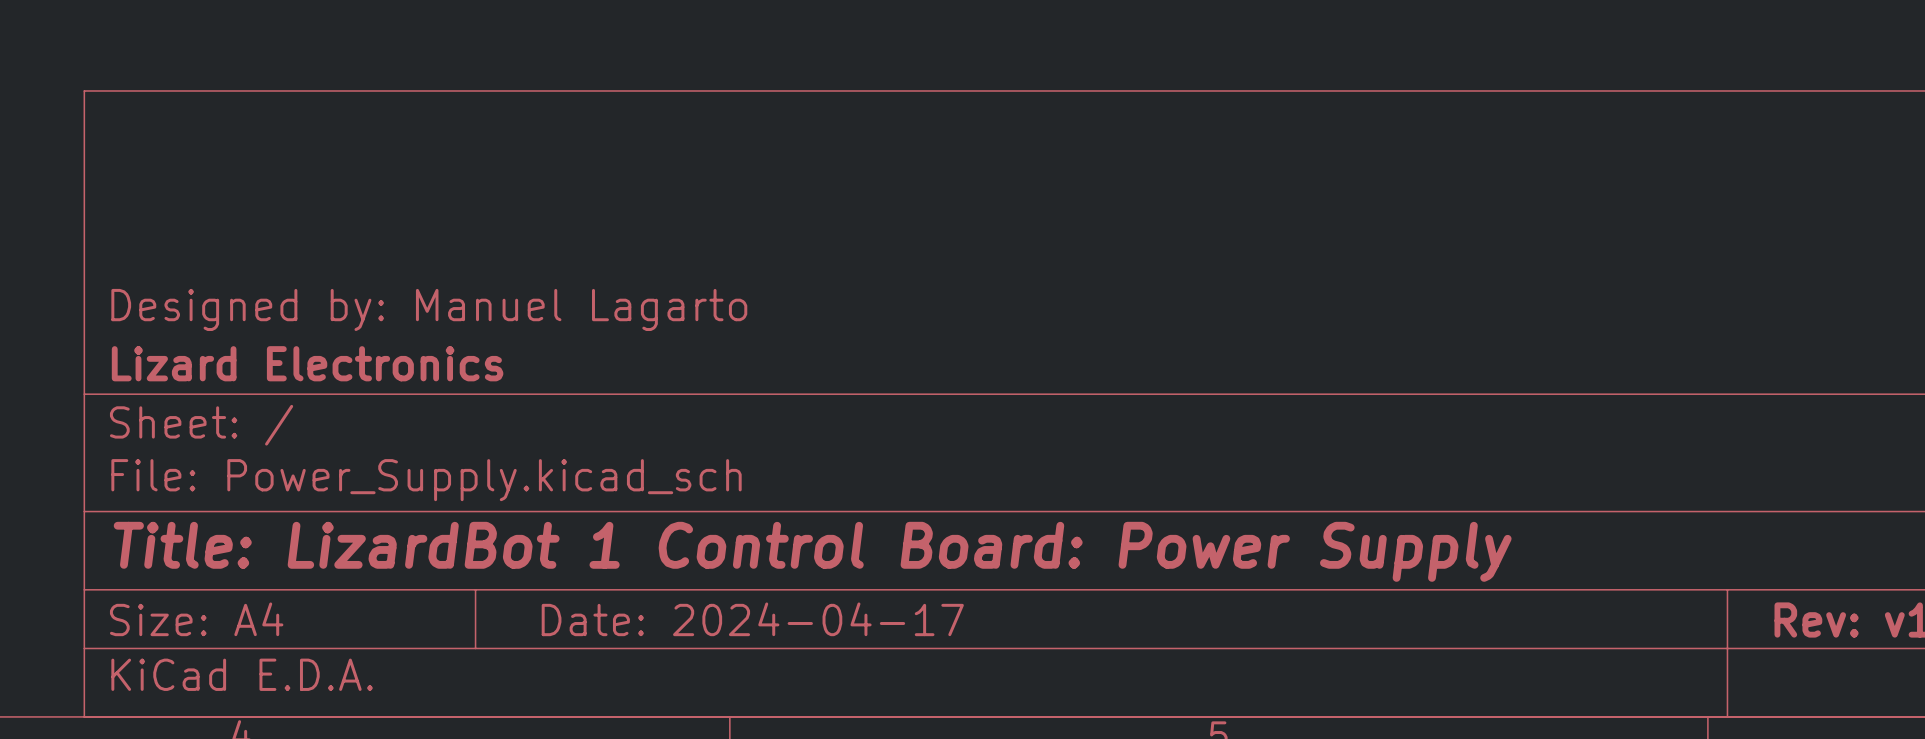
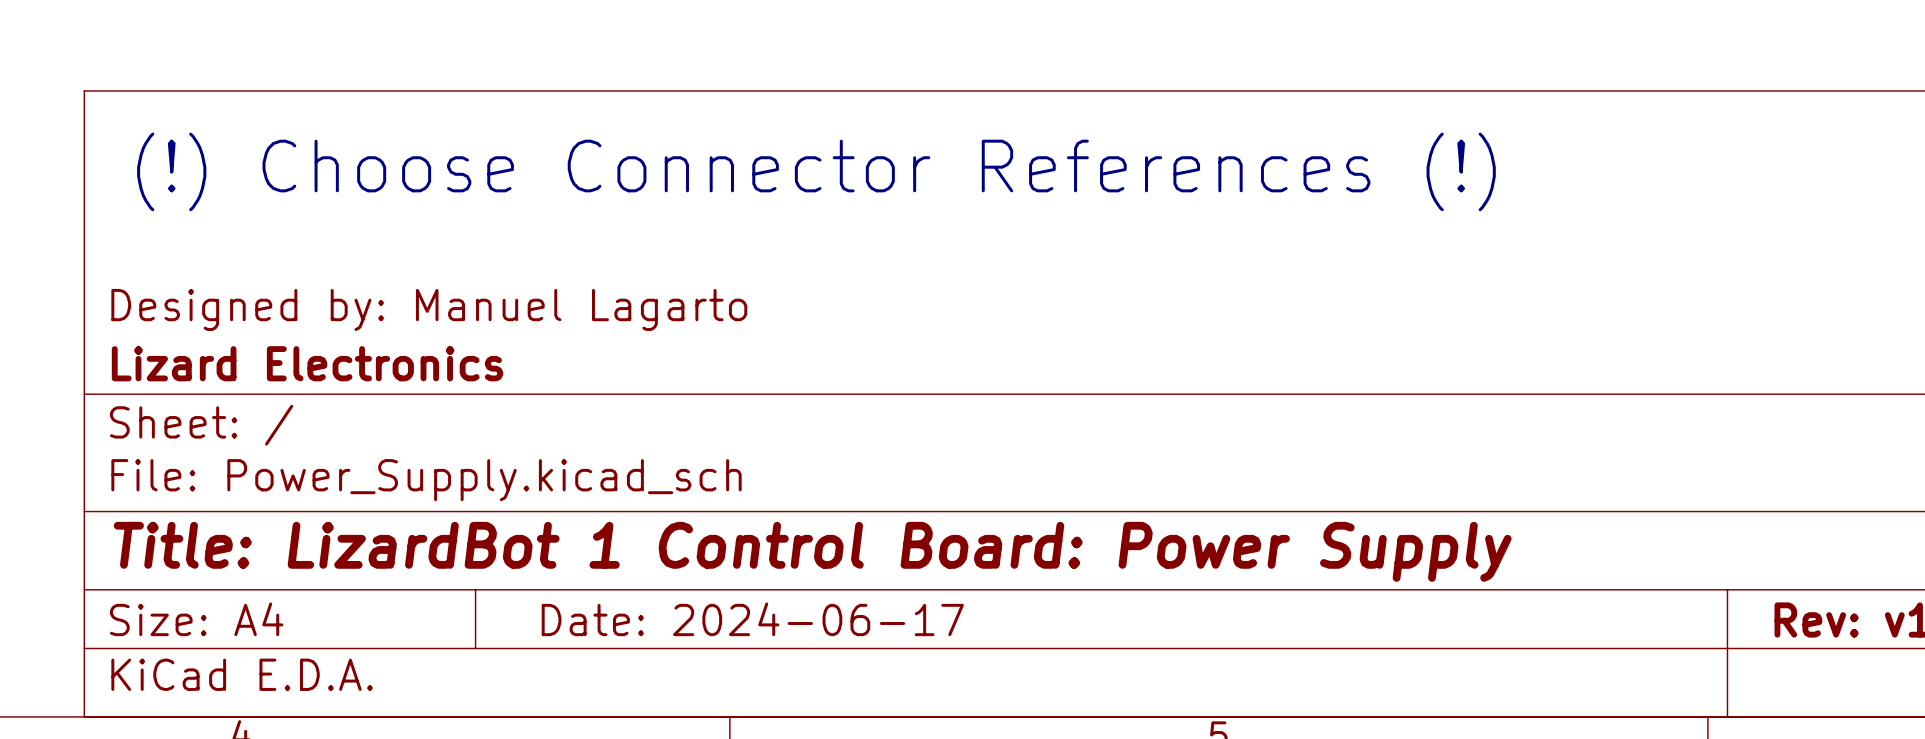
text: none -> (!) Choose Connector References (!) (816, 171)
title block: Date: 2024-04-17 (752, 619) -> Date: 2024-06-17 (752, 619)

